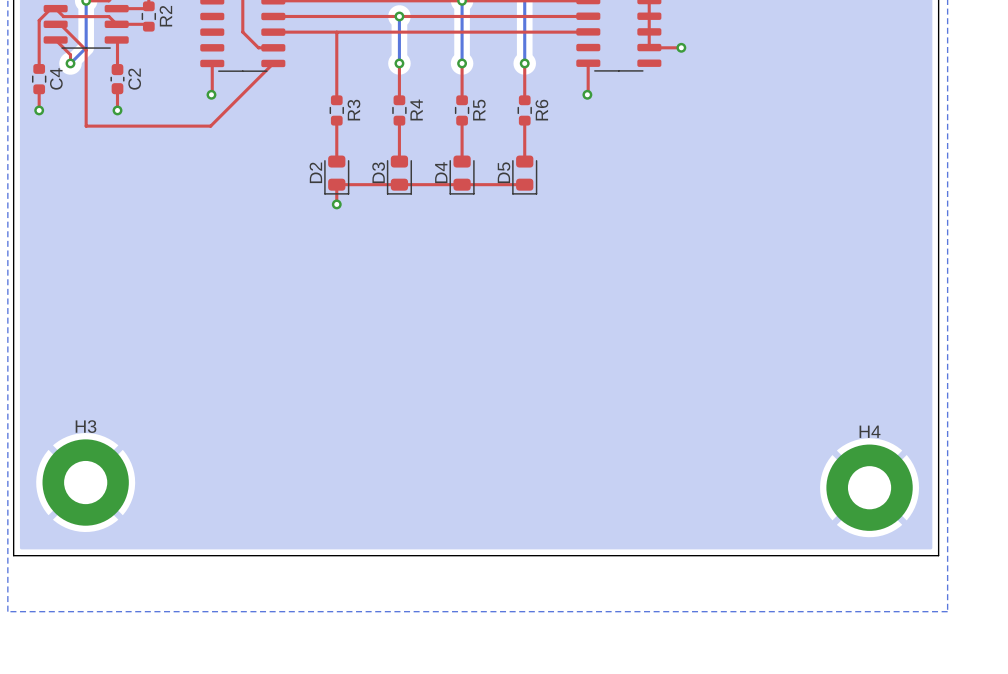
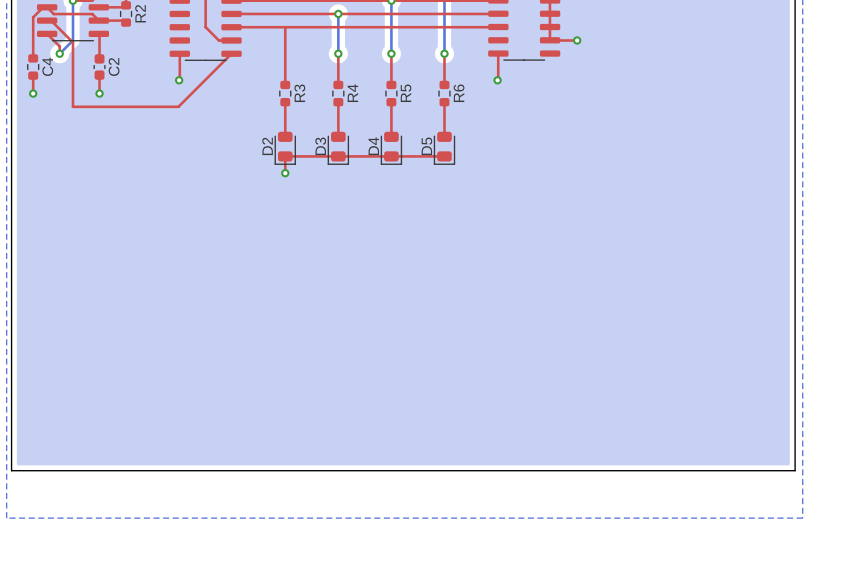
H3: (85, 482) -> none
H4: (869, 487) -> none

